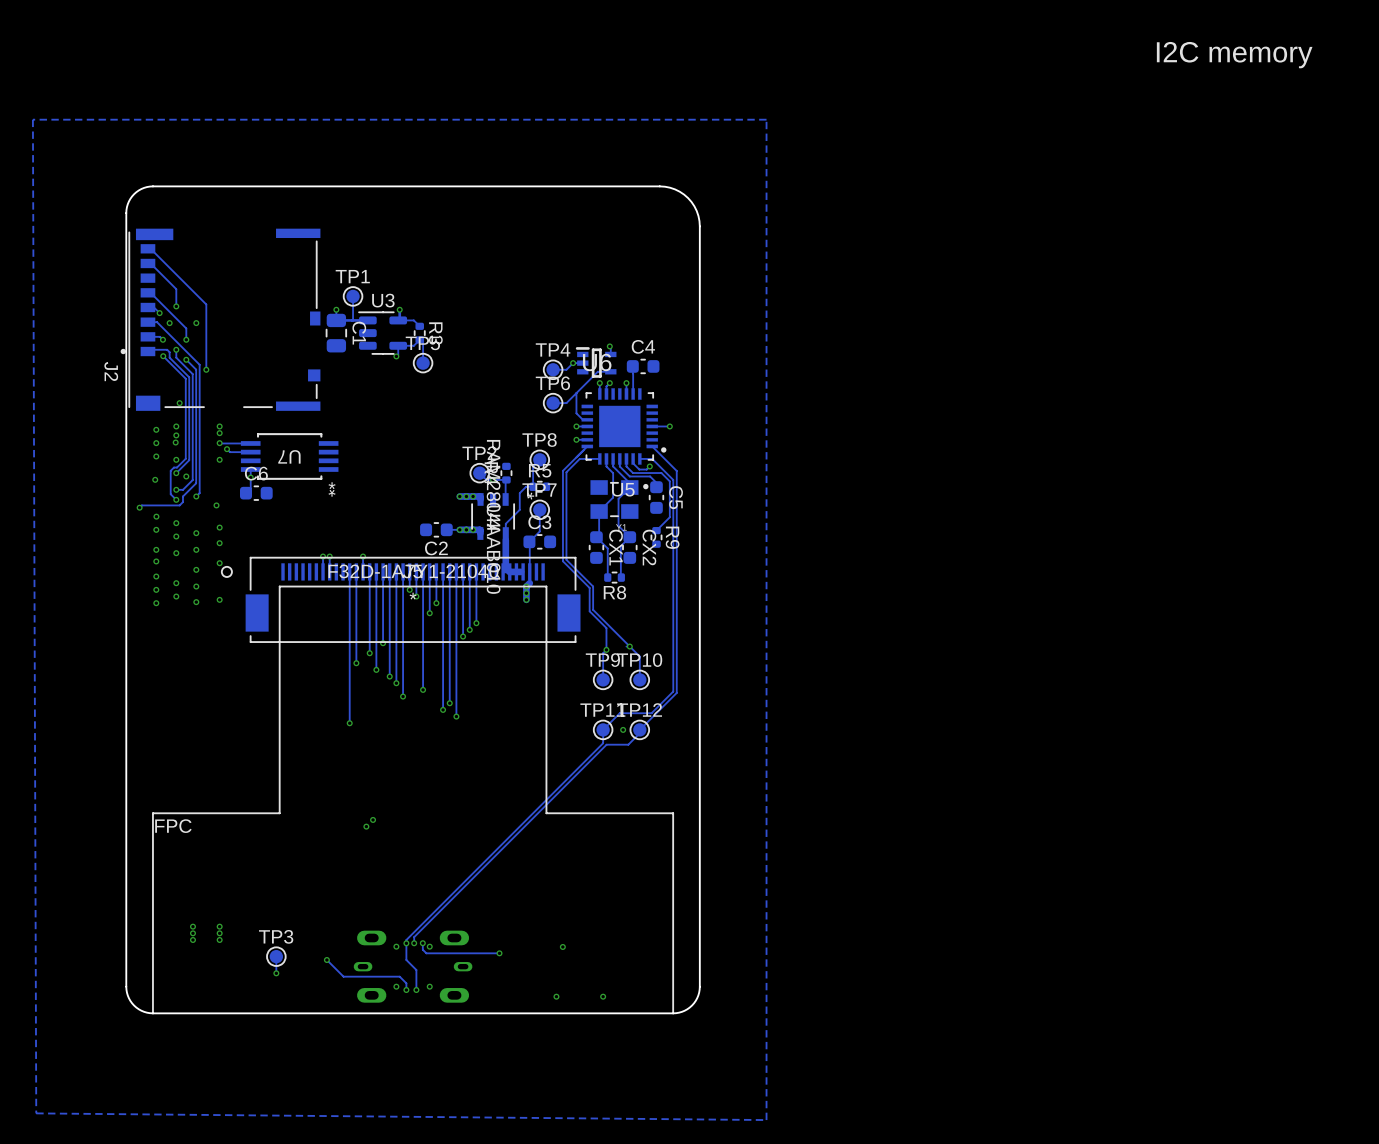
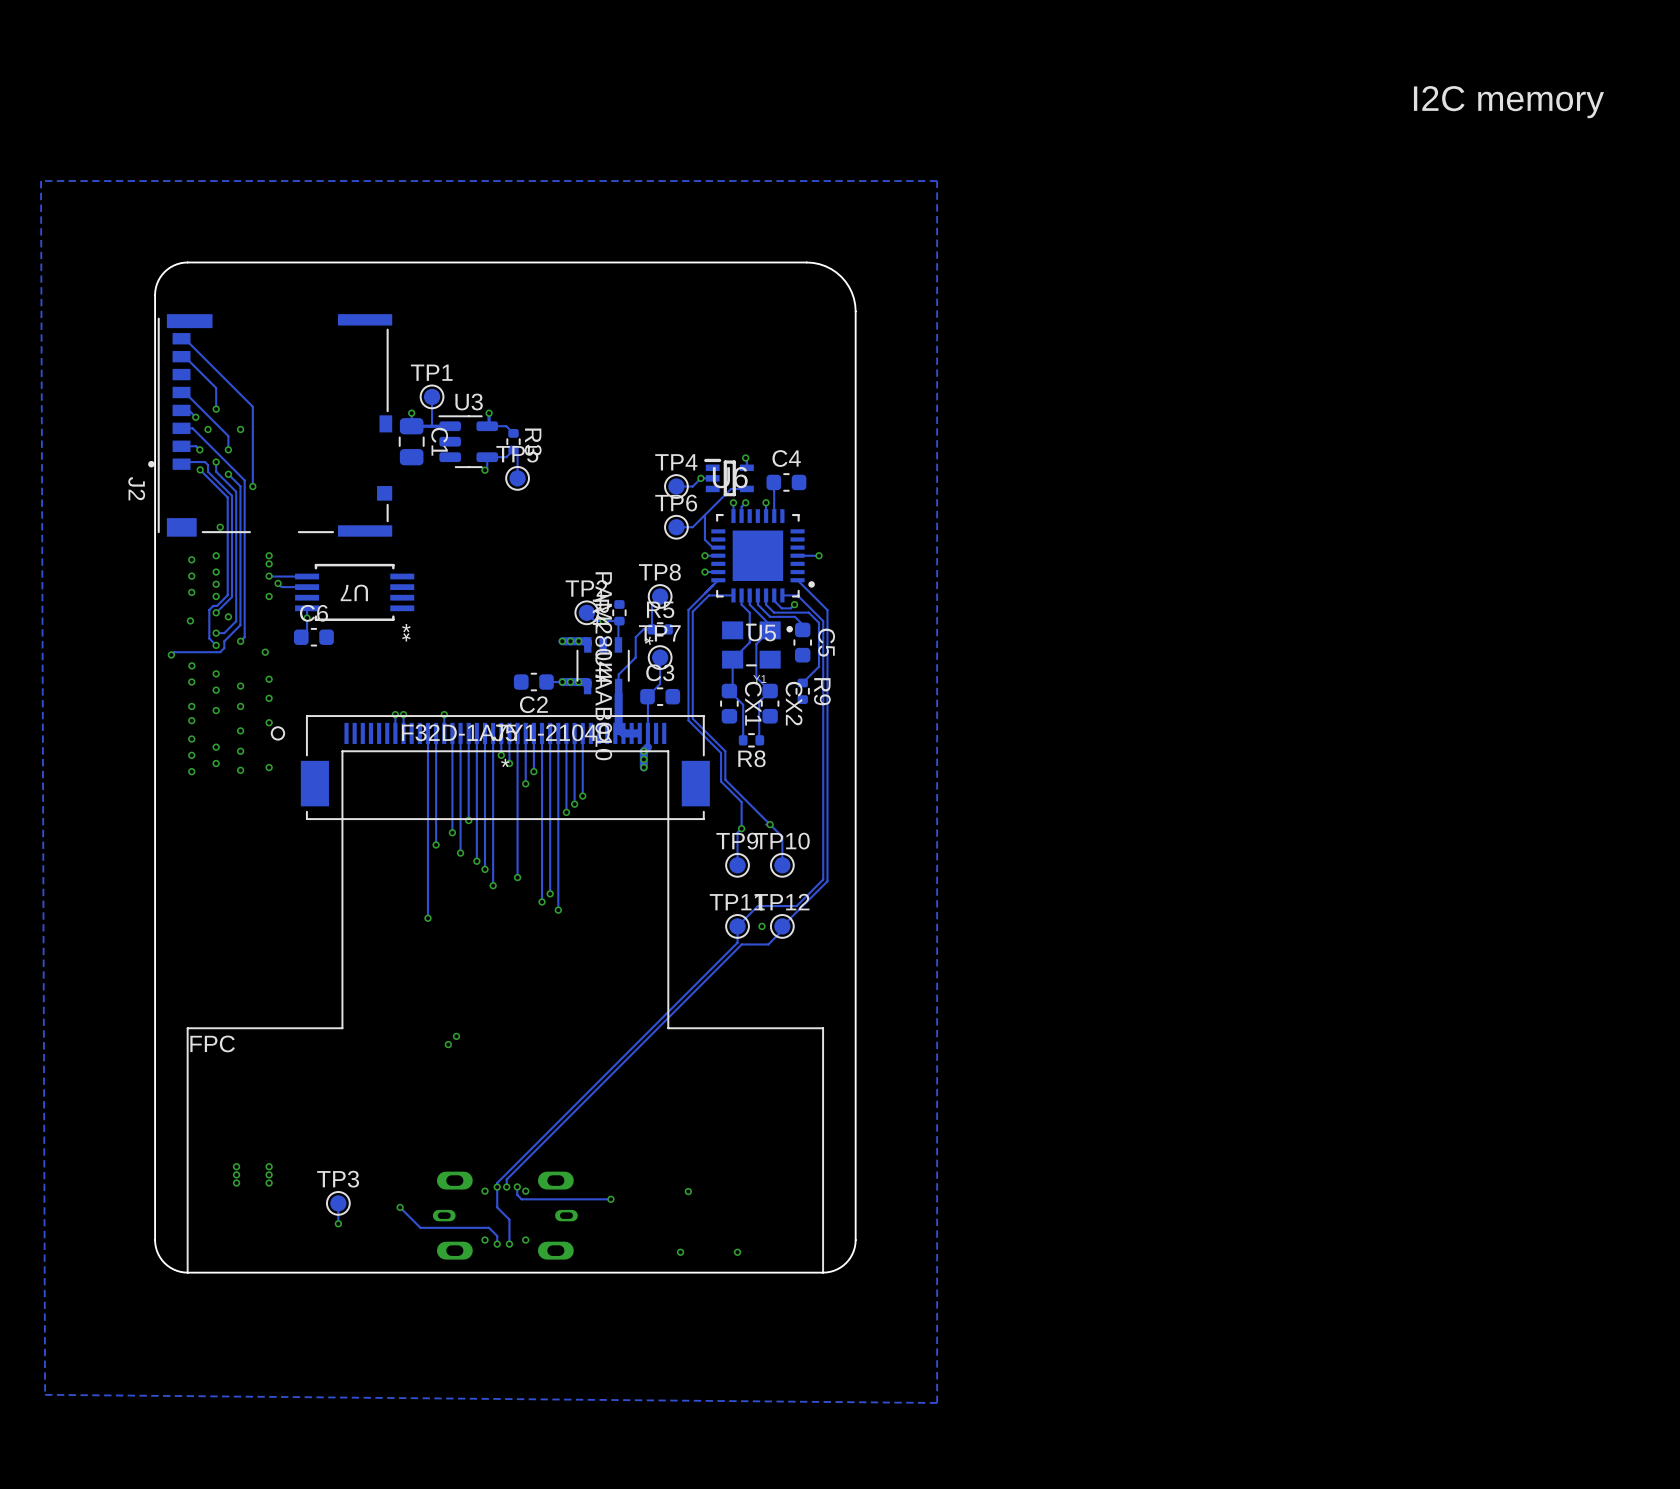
via: (176, 435) -> none
via: none -> (216, 572)
via: (175, 442) -> none
via: none -> (216, 584)

